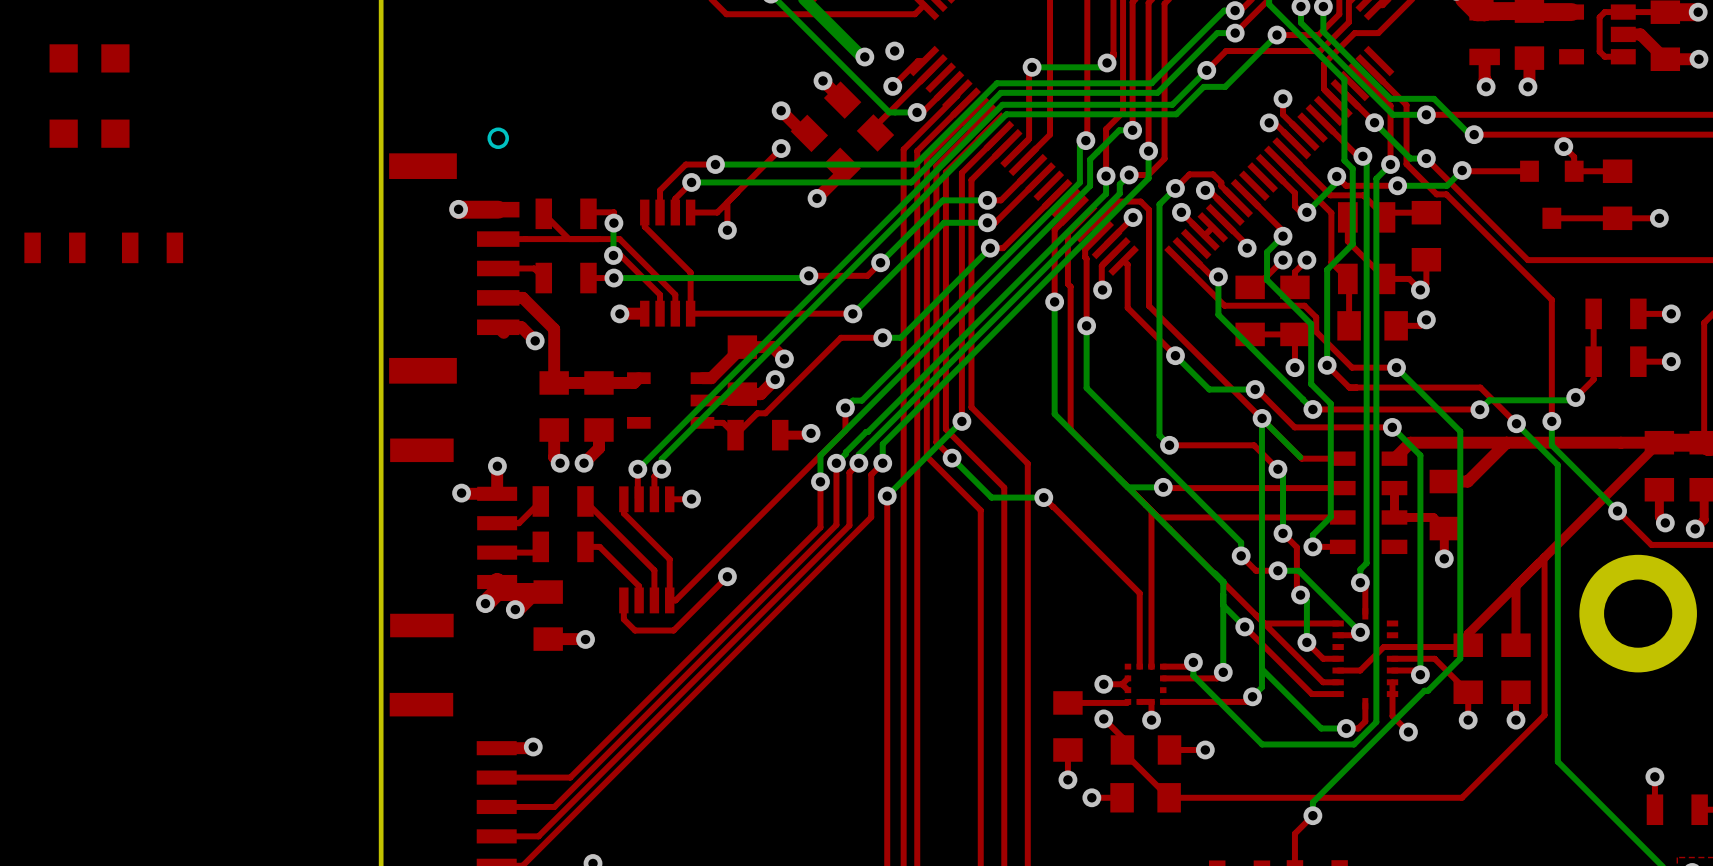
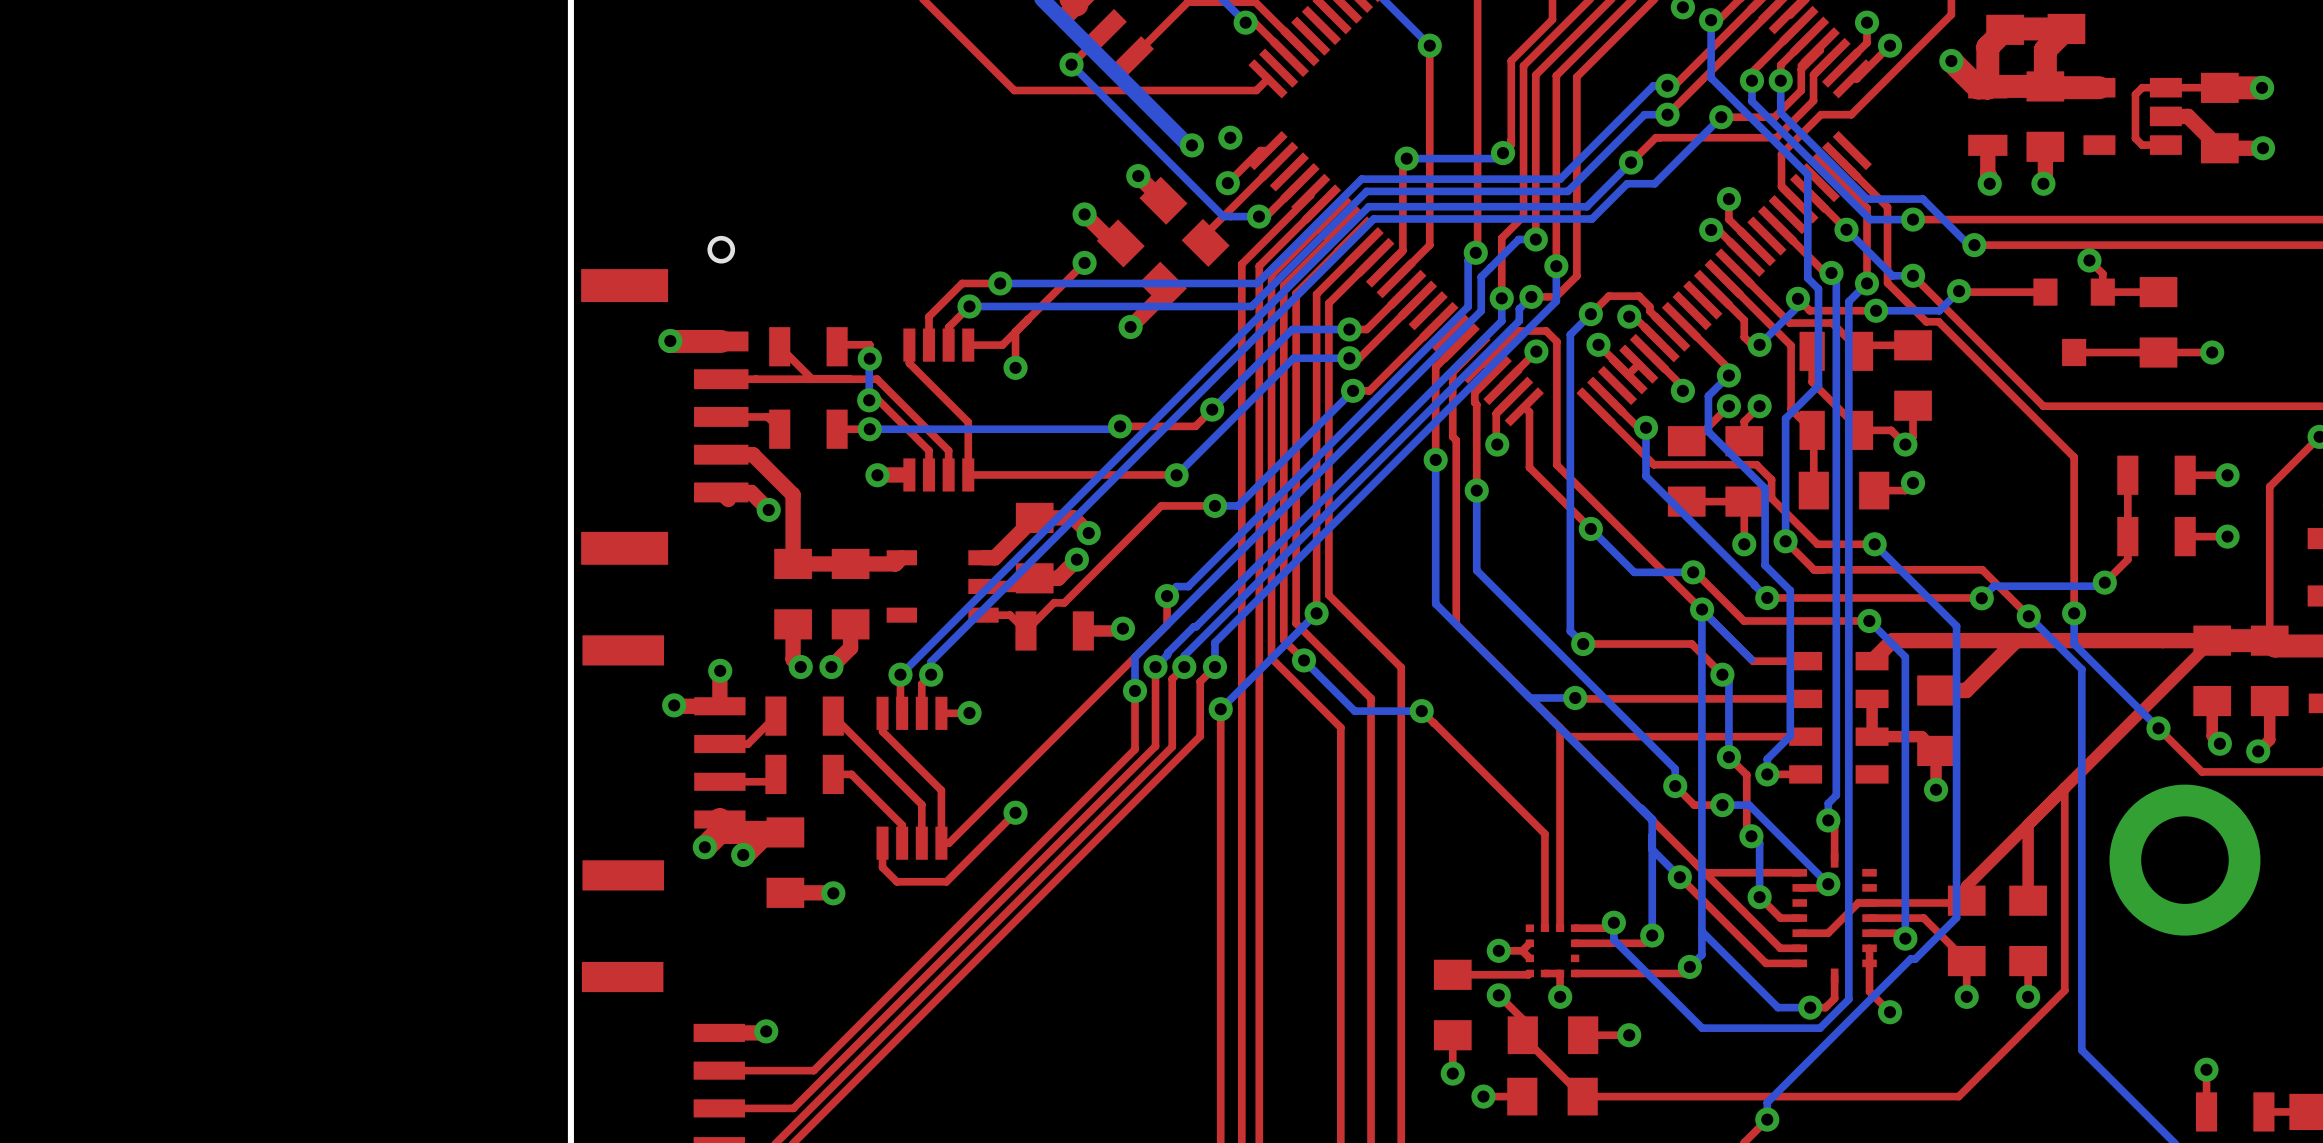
part: (89, 58) -> none
part: (89, 133) -> none
part: (54, 247) -> none
part: (152, 247) -> none

